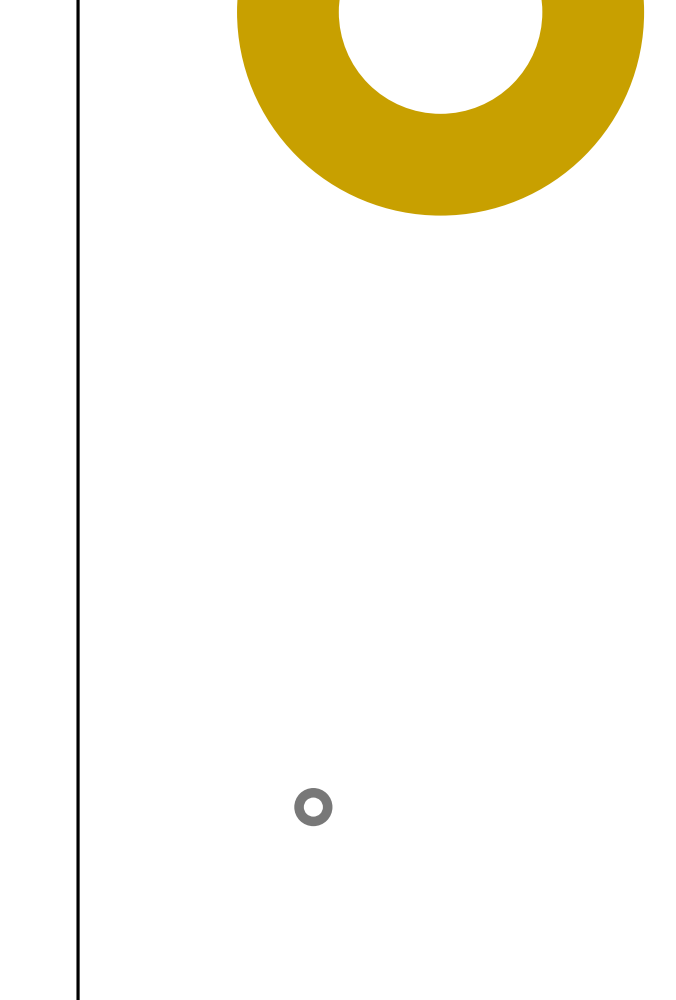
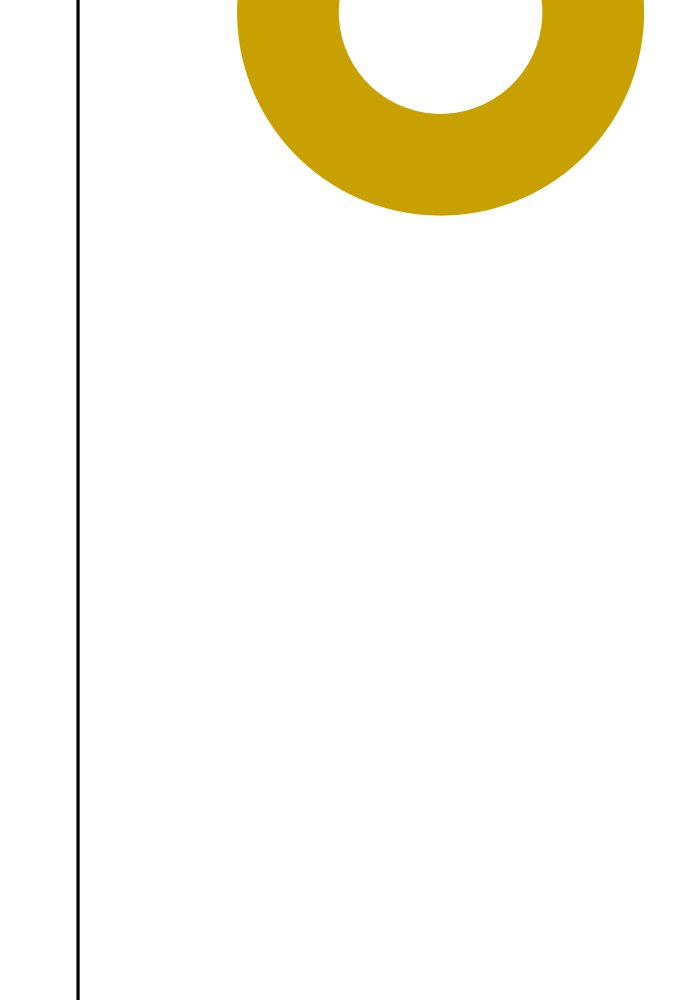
via: (313, 807) -> none

